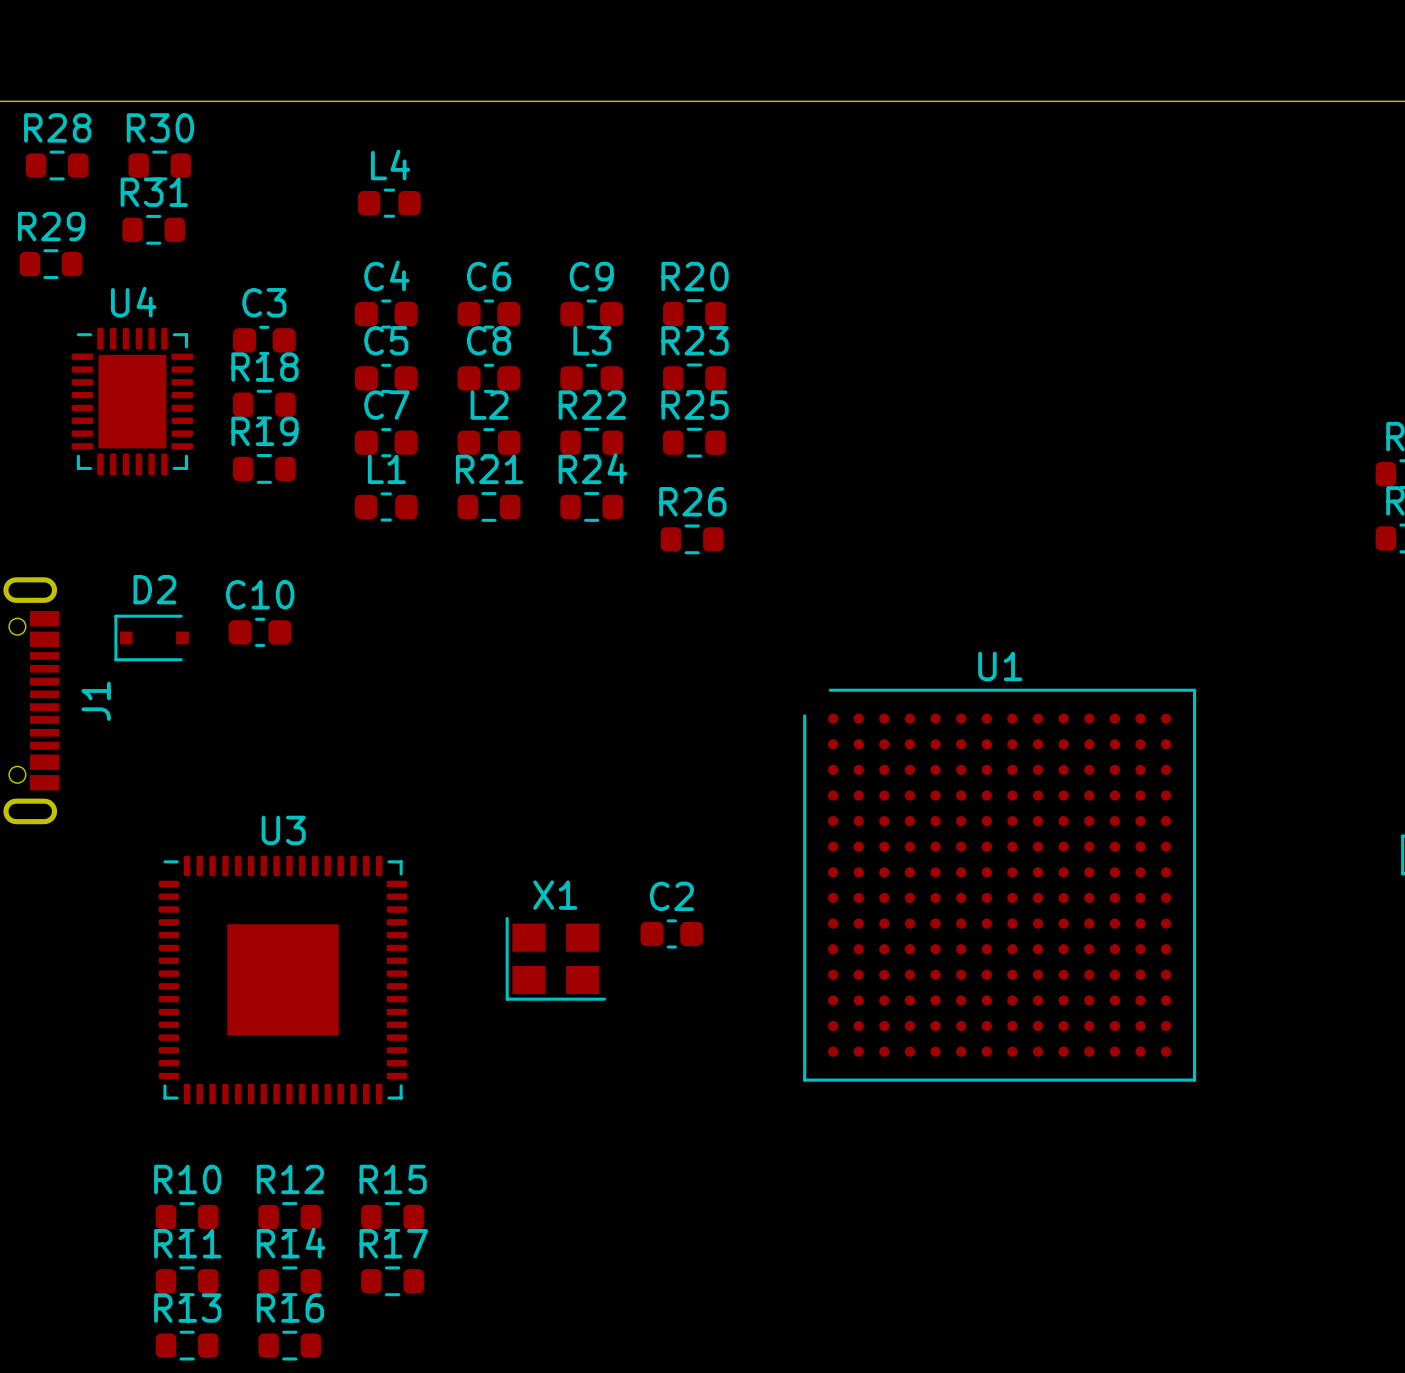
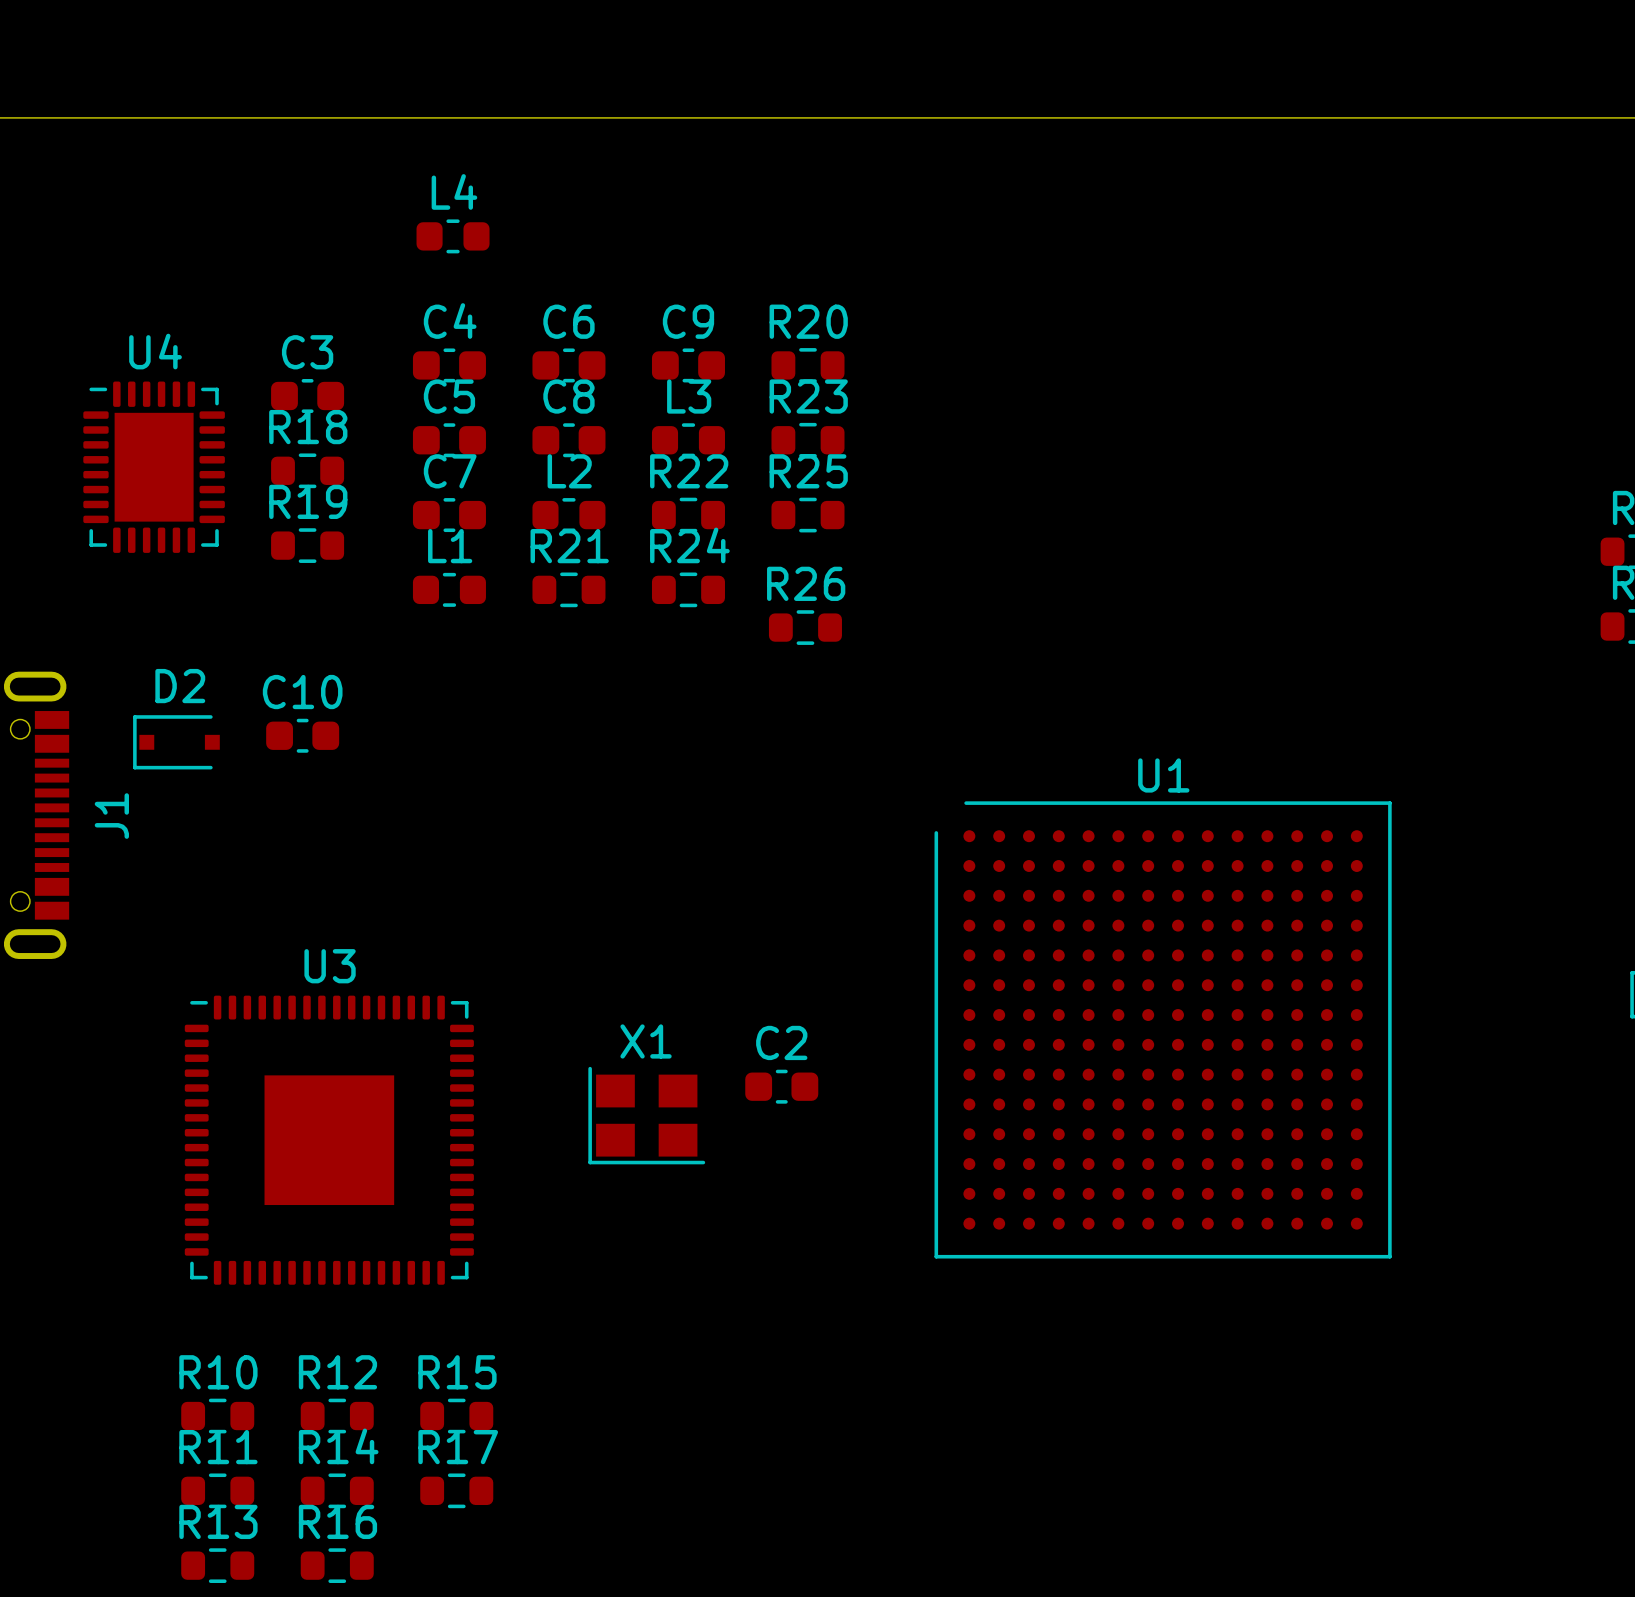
R28: (57, 165) -> none
R30: (159, 165) -> none
R31: (153, 229) -> none
R29: (50, 264) -> none

